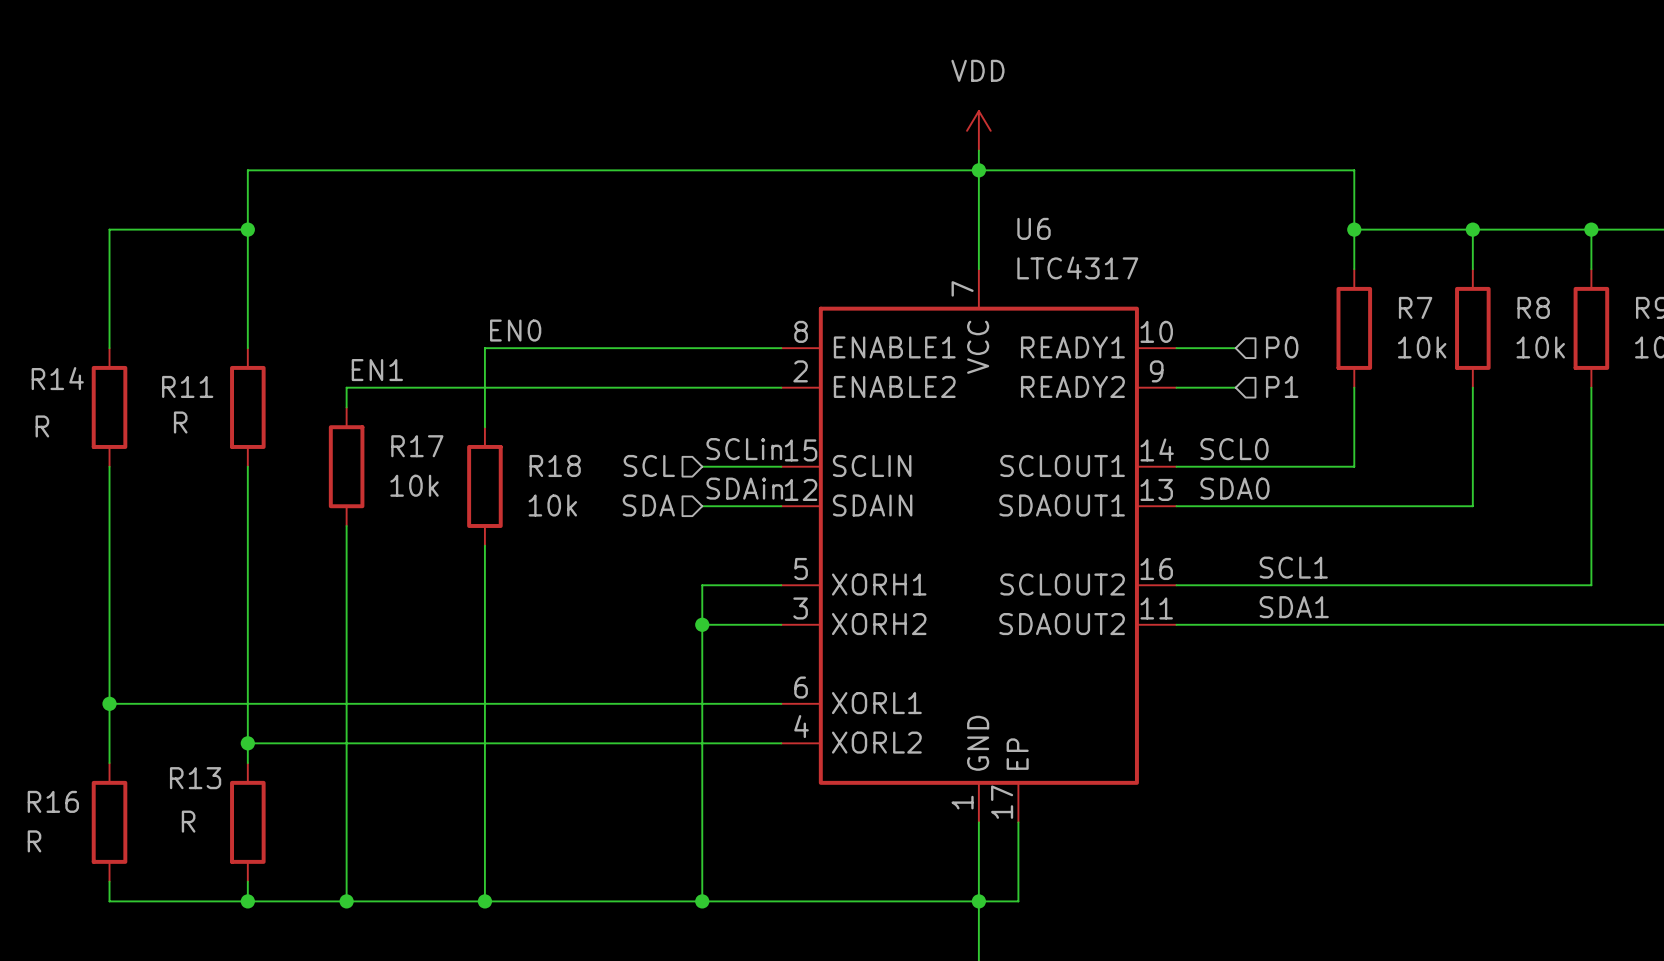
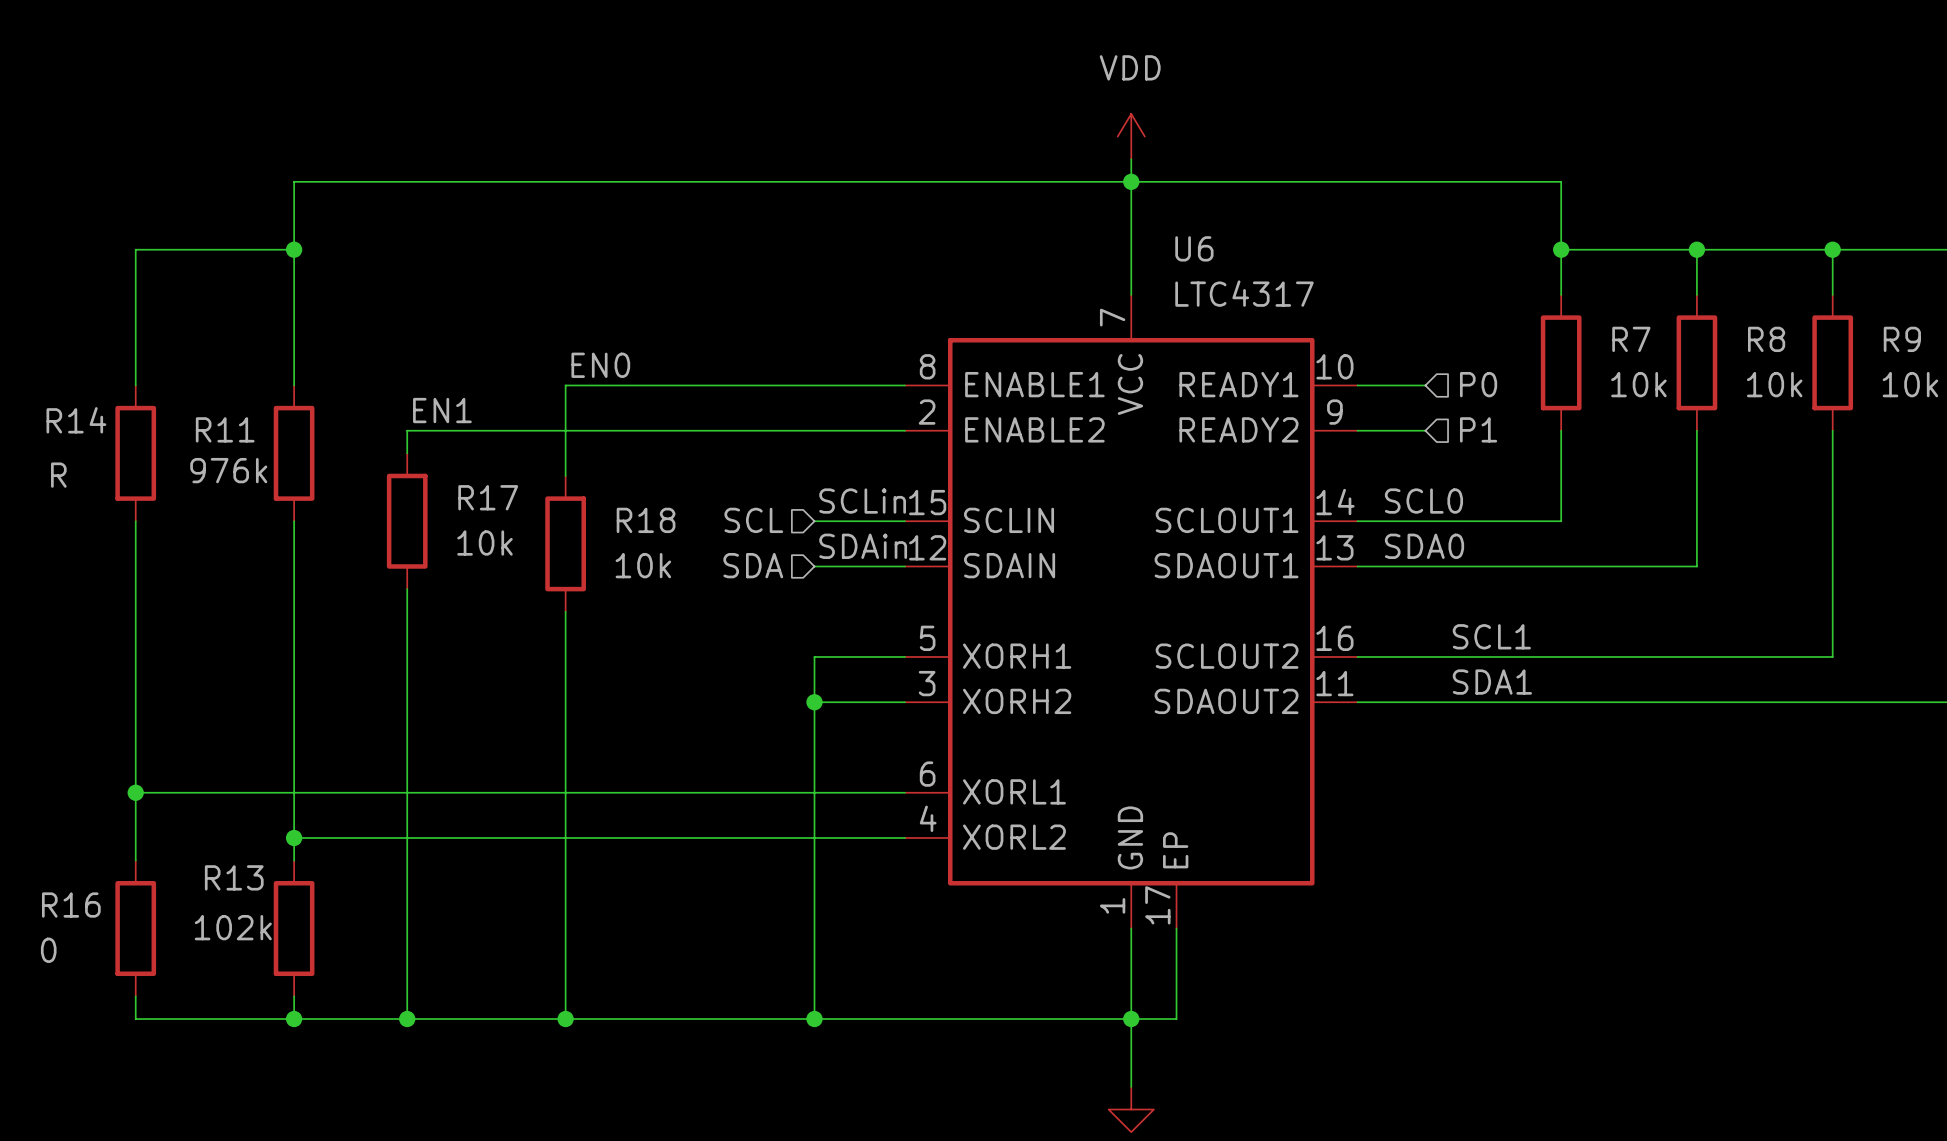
R11 value: R (180, 422) -> 976k (228, 470)
R13 value: R (188, 821) -> 102k (233, 927)
R16 value: R (34, 841) -> 0 (48, 950)

